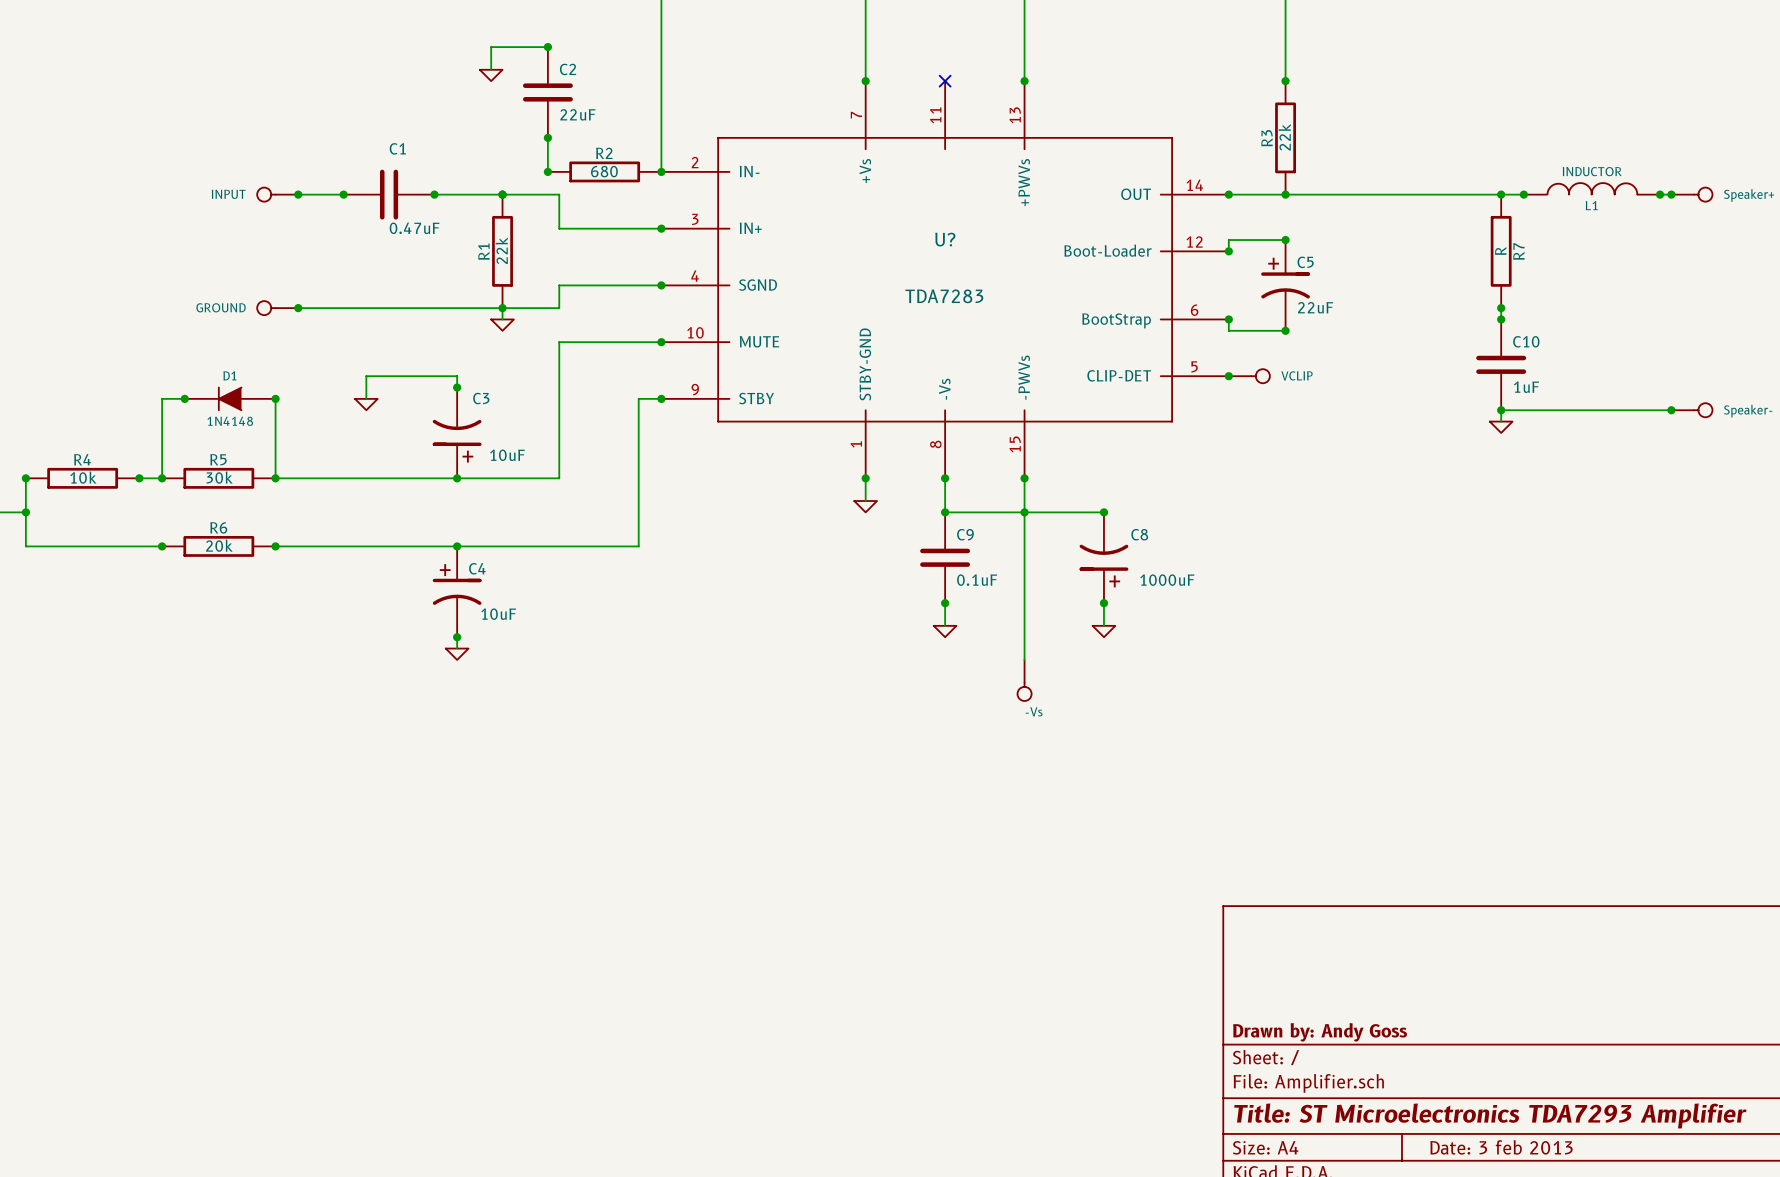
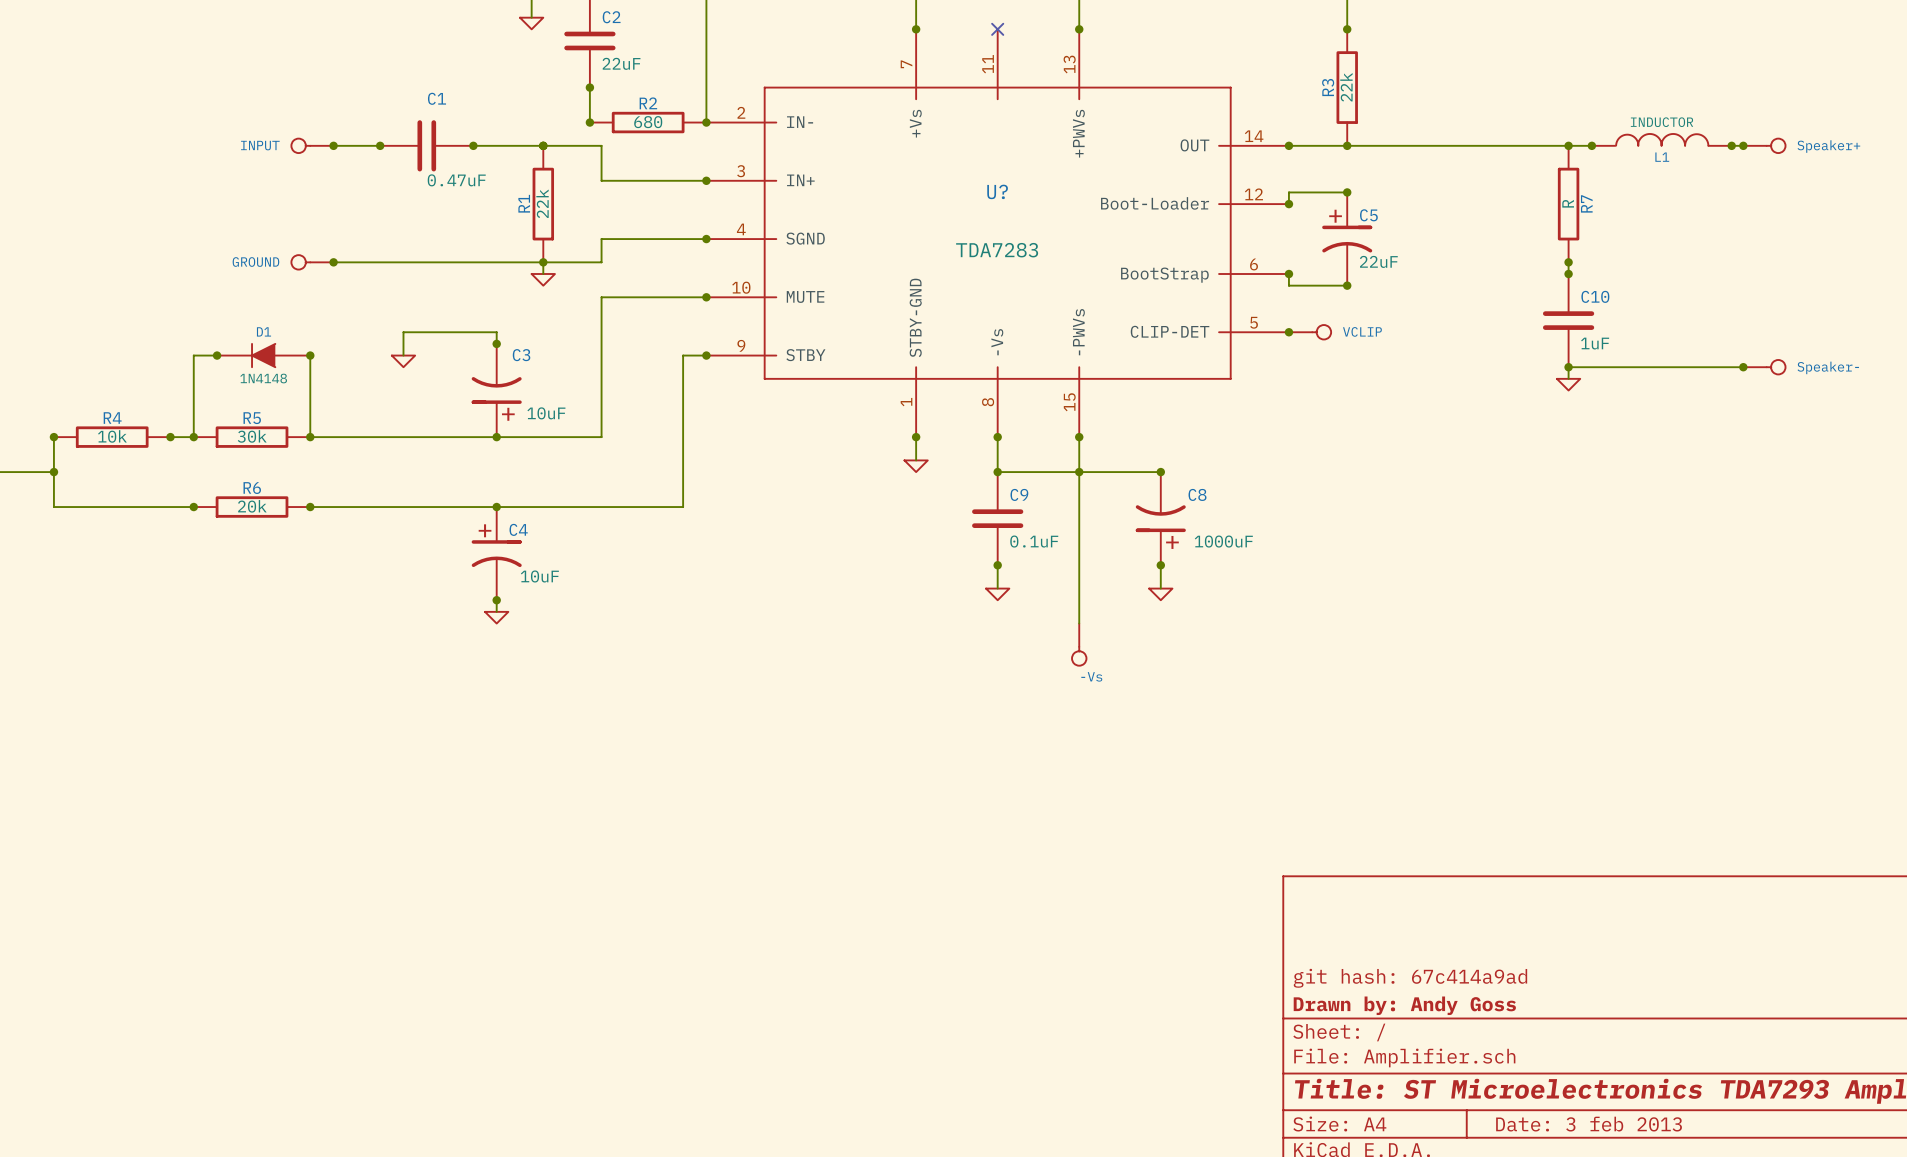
title block: none -> git hash: 67c414a9ad (1410, 978)

